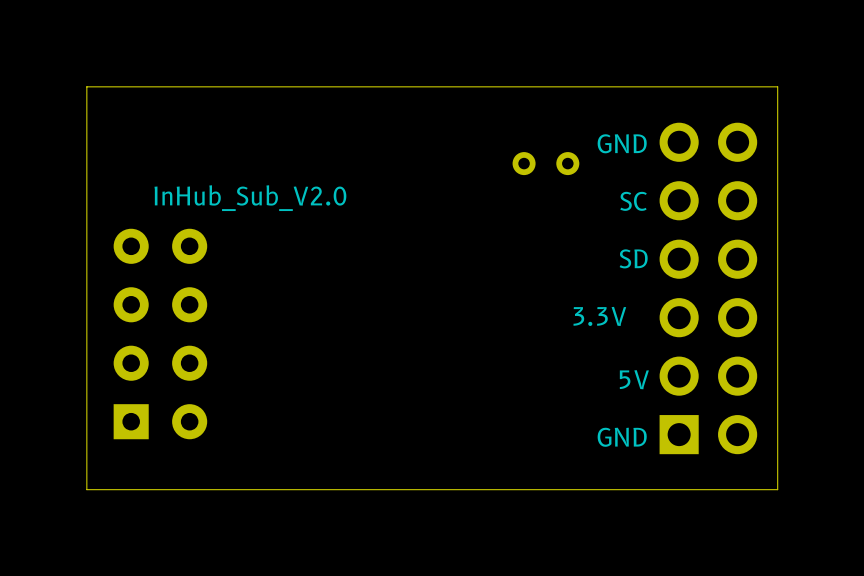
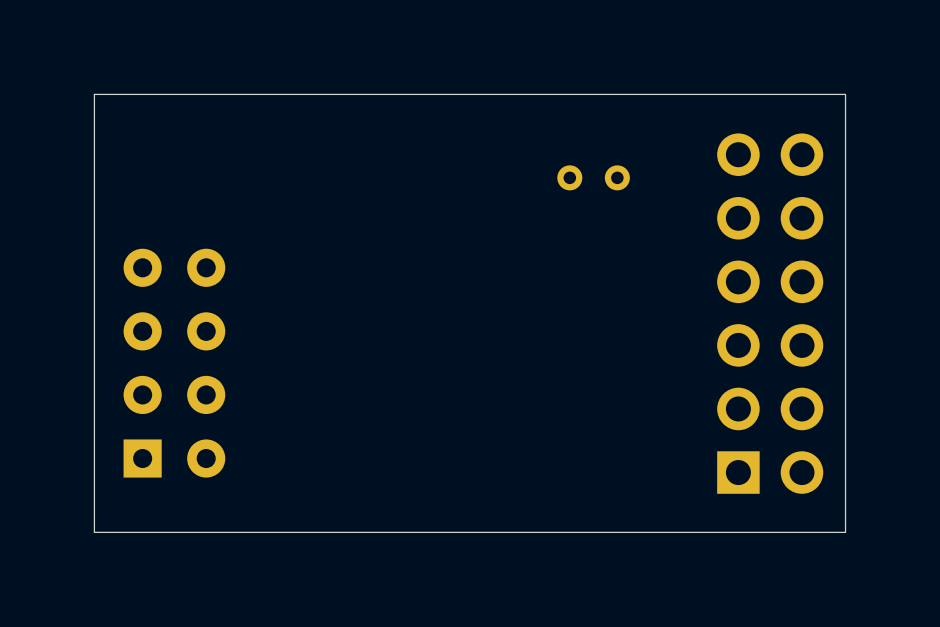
text: GND (622, 143) -> none
text: InHub_Sub_V2.0 (250, 198) -> none
text: SC (633, 201) -> none
text: SD (633, 258) -> none
text: 3.3V (599, 316) -> none
text: 5V (634, 379) -> none
text: GND (622, 437) -> none

